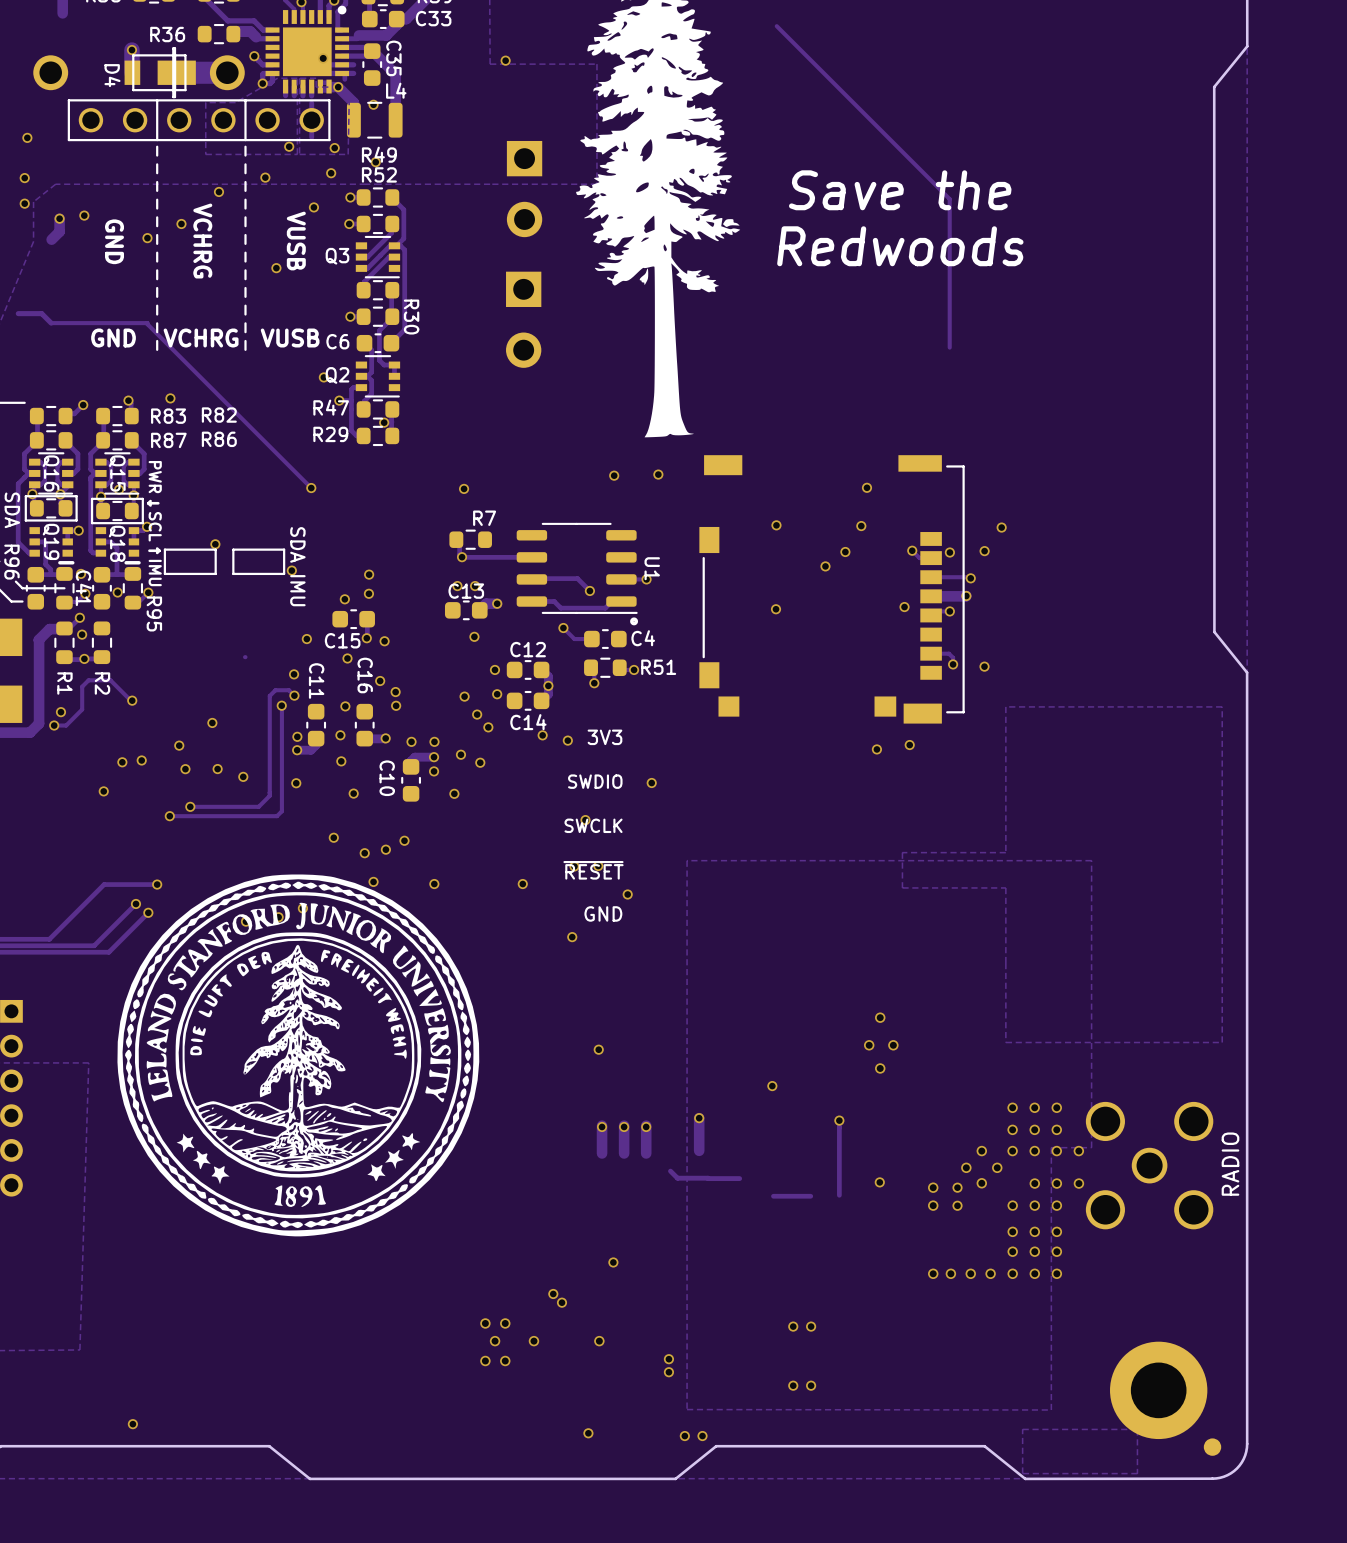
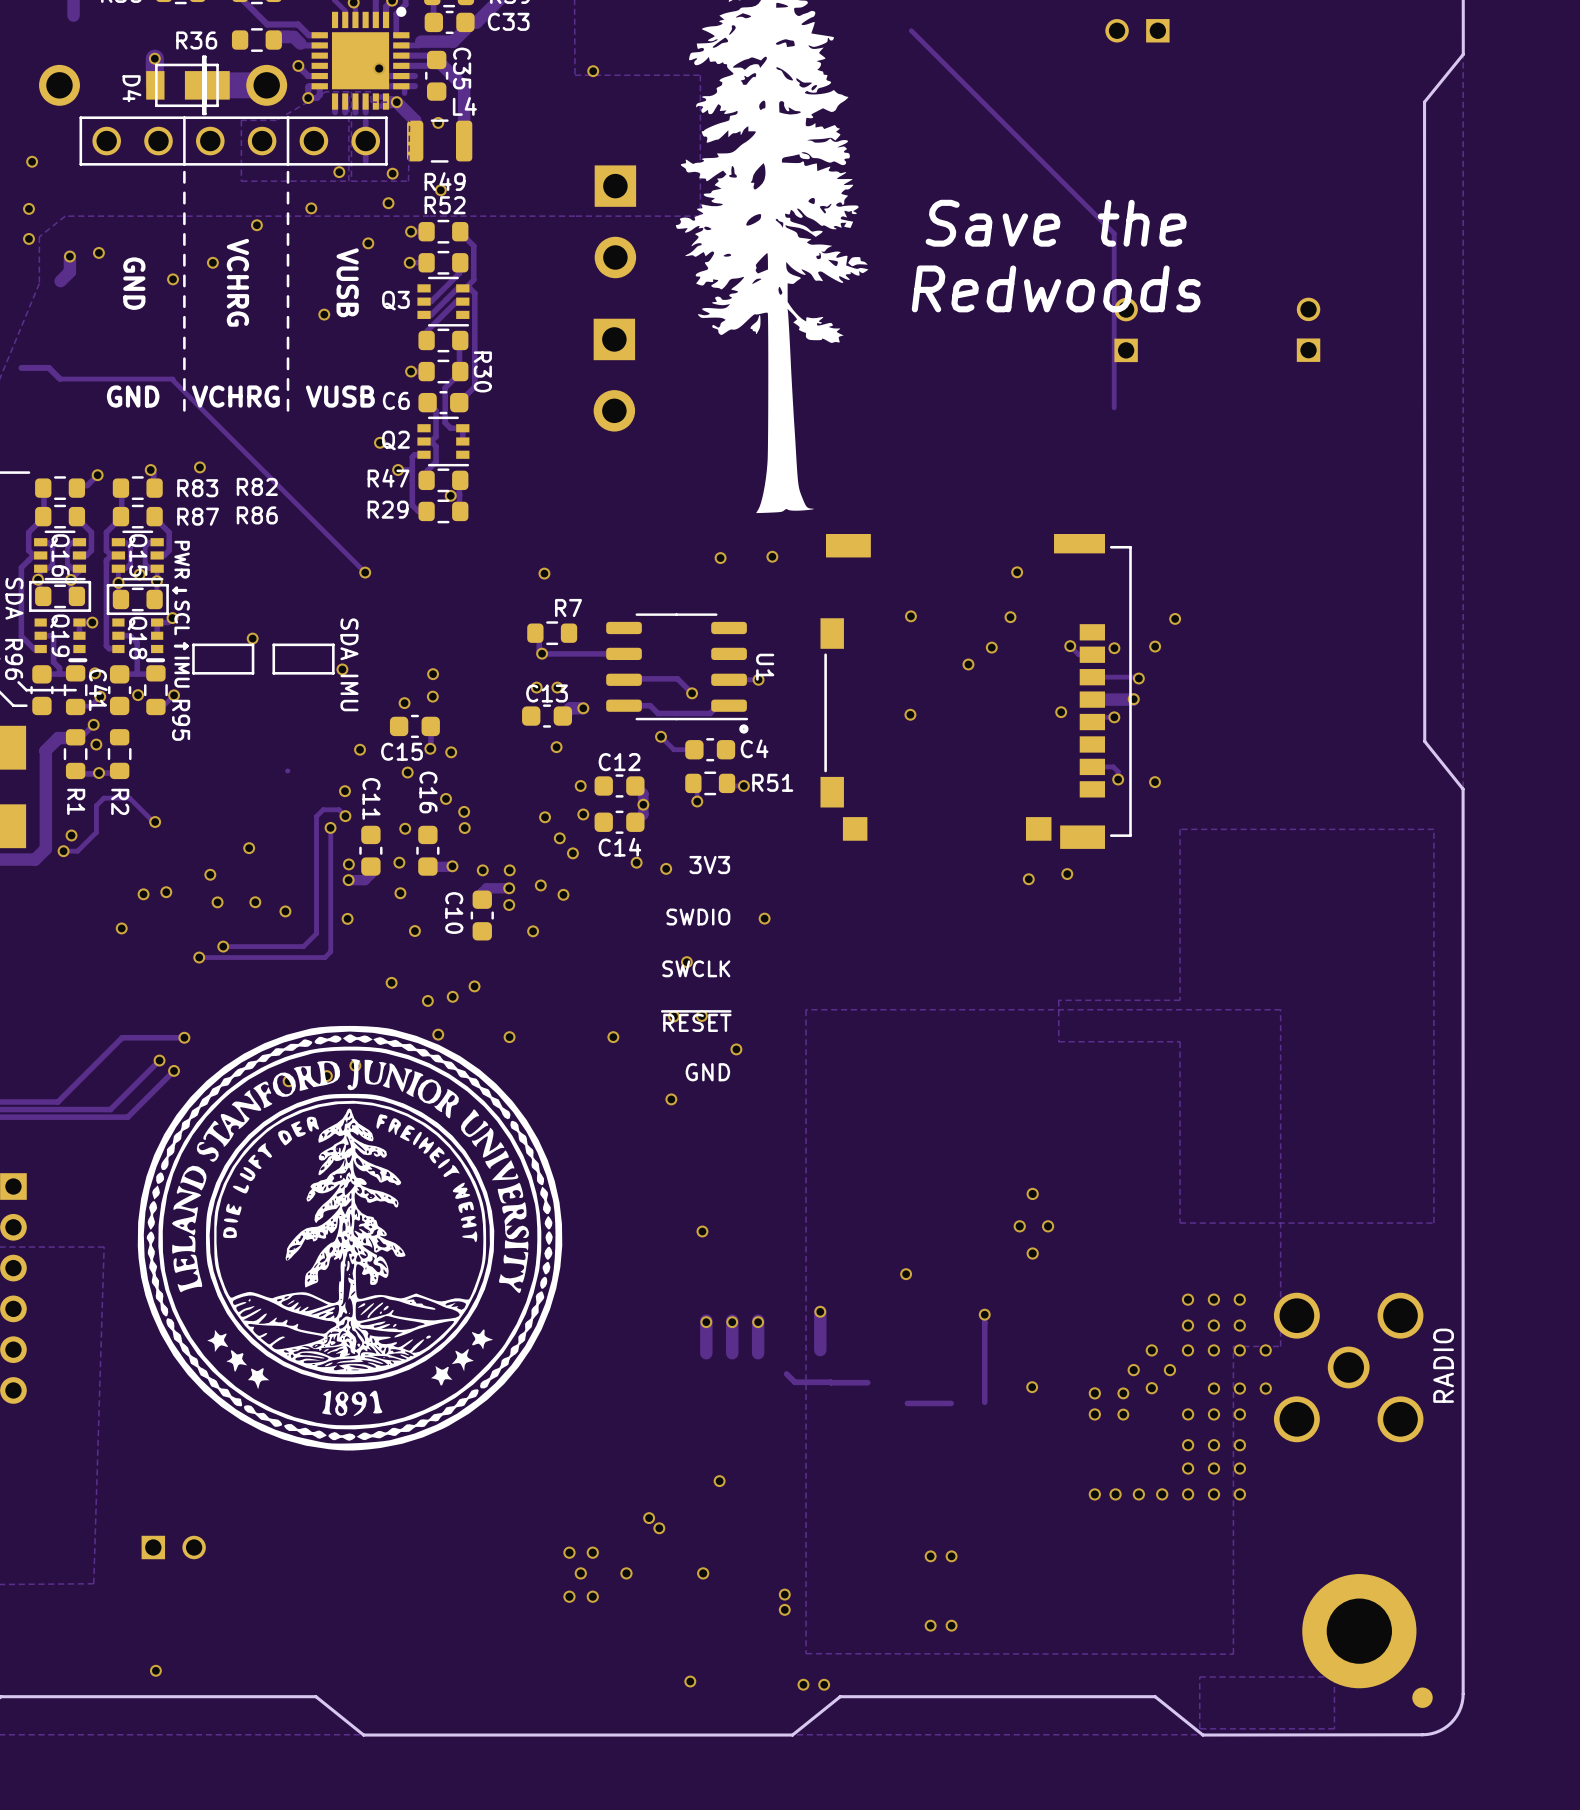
part: none -> (1137, 30)
part: none -> (1126, 329)
part: none -> (1308, 329)
part: none -> (173, 1547)

